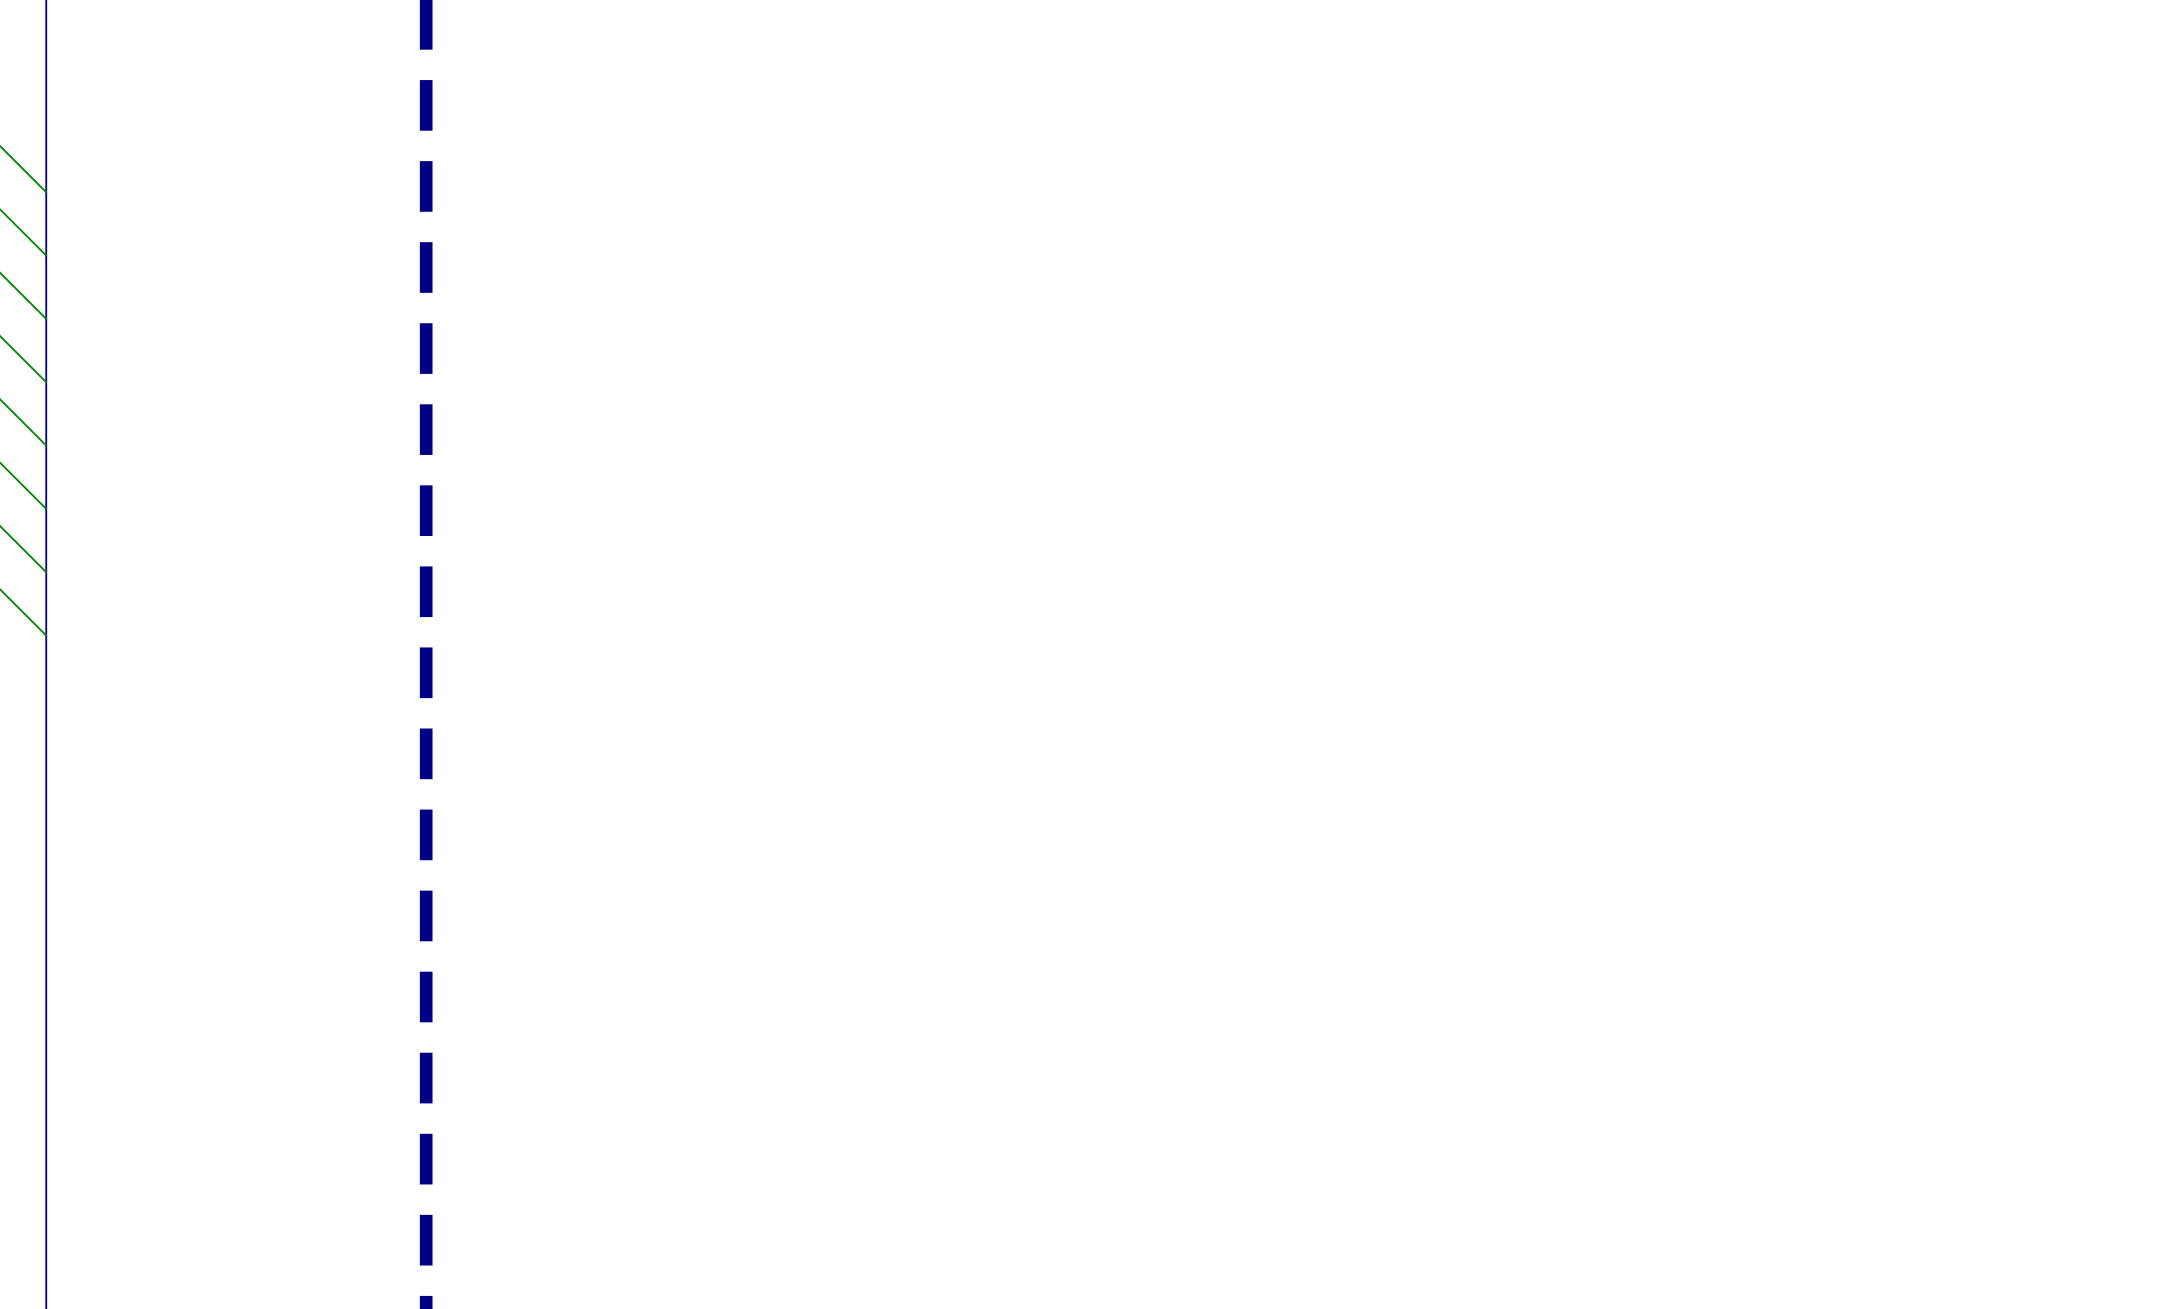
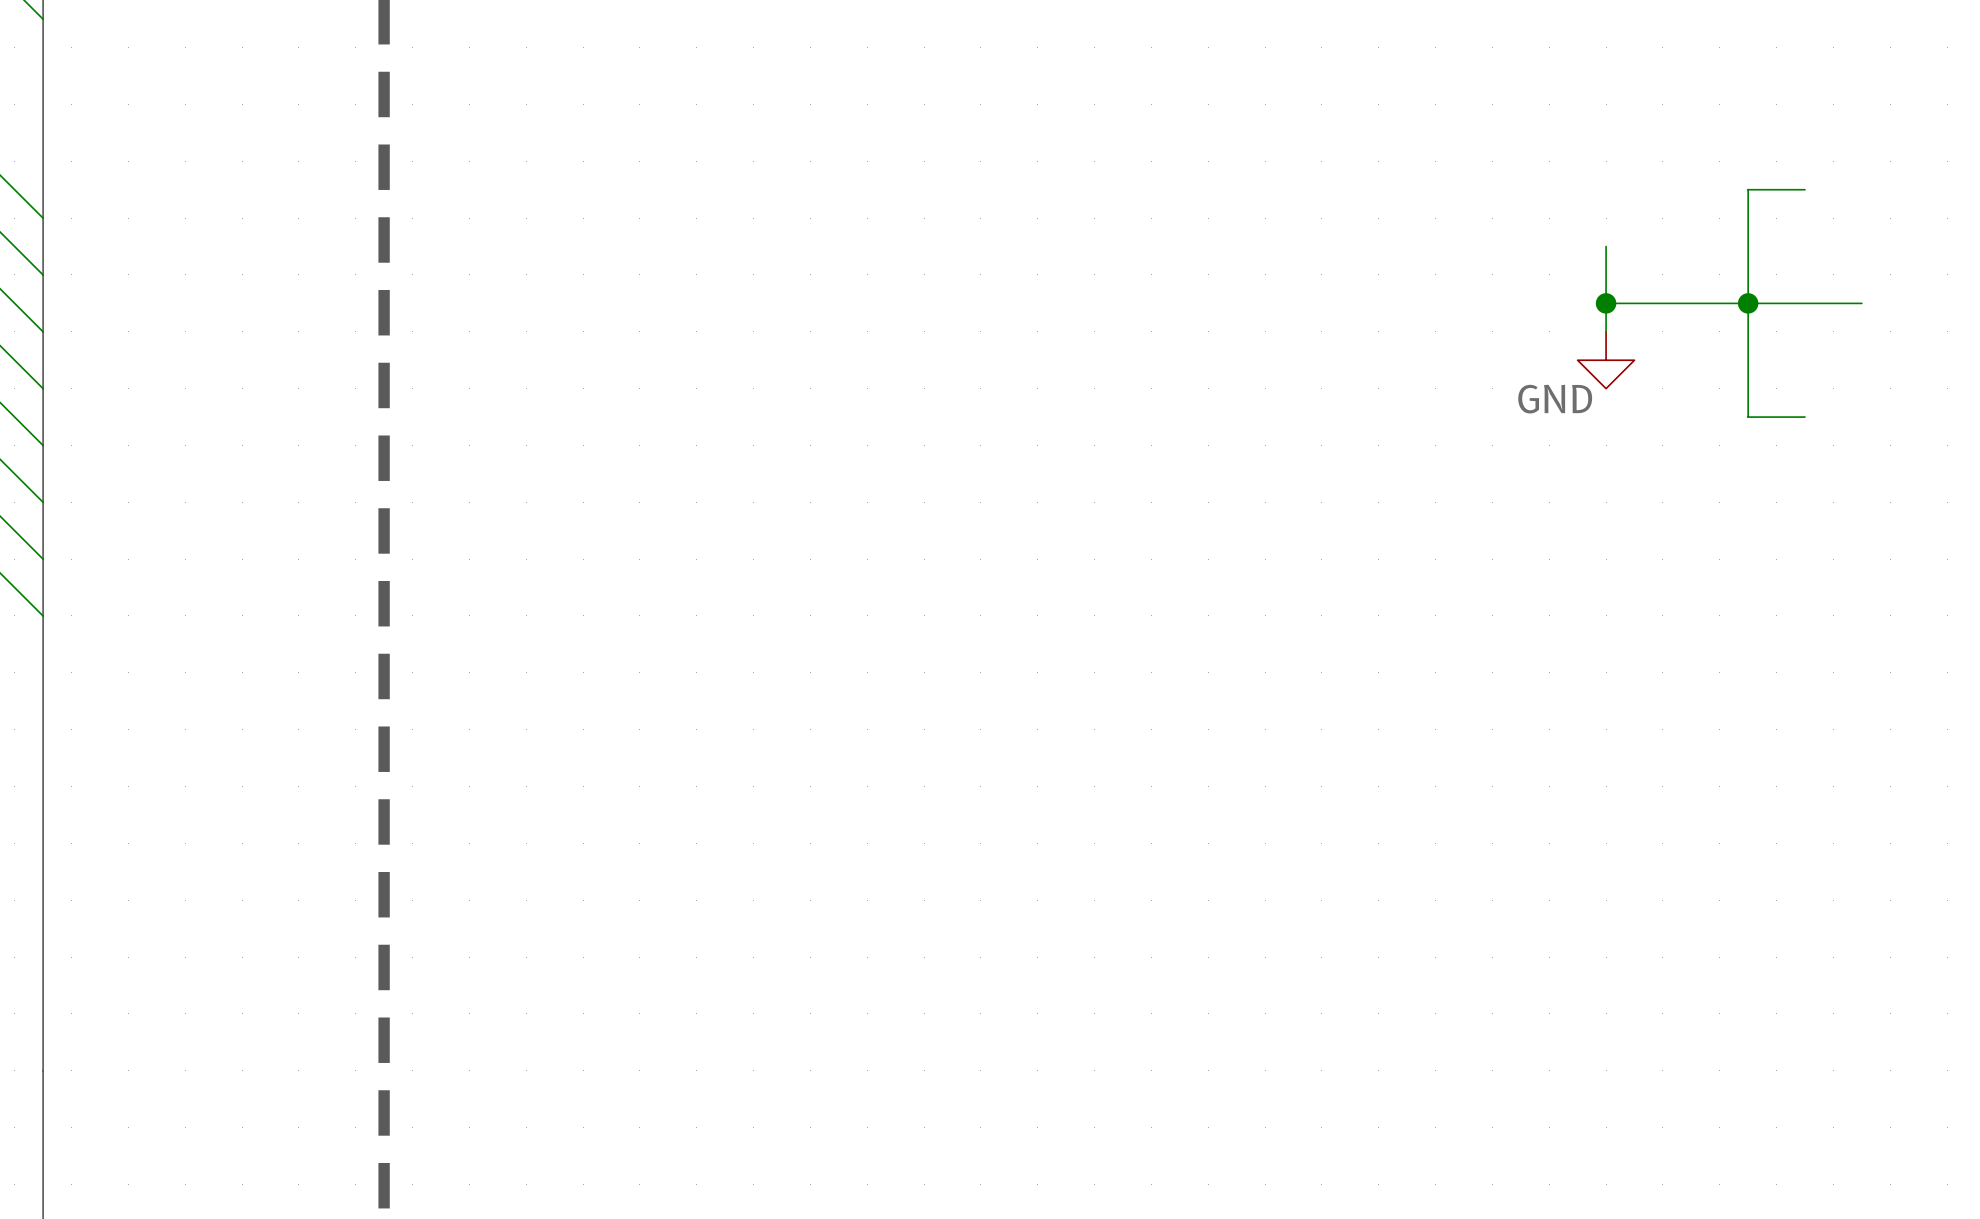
wire: none -> (1804, 189) (1748, 189) (1748, 417) (1804, 417)
wire: none -> (1606, 246) (1606, 331)
wire: none -> (1606, 303) (1861, 303)
junction: none -> (1606, 303)
junction: none -> (1748, 303)
power symbol: none -> GND (1606, 360)

